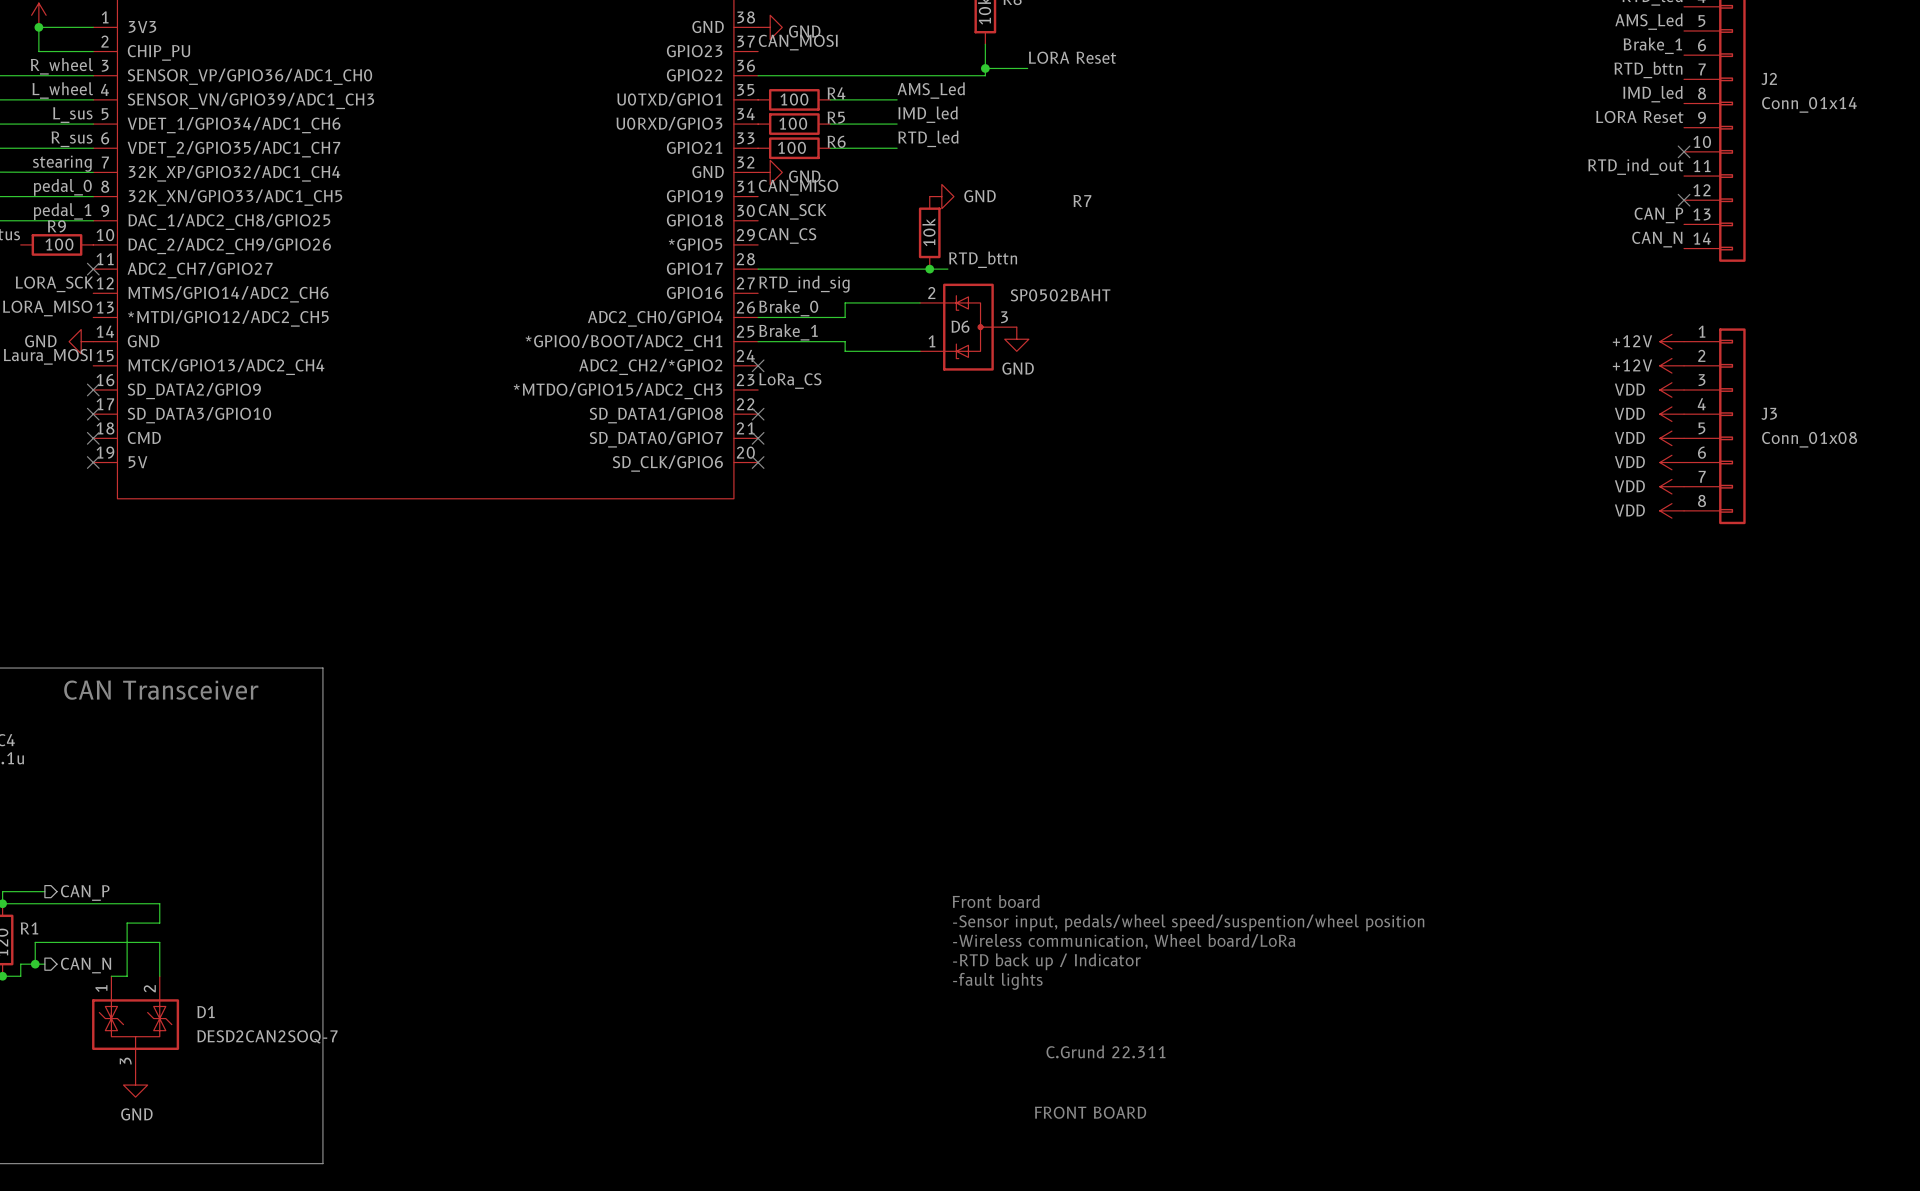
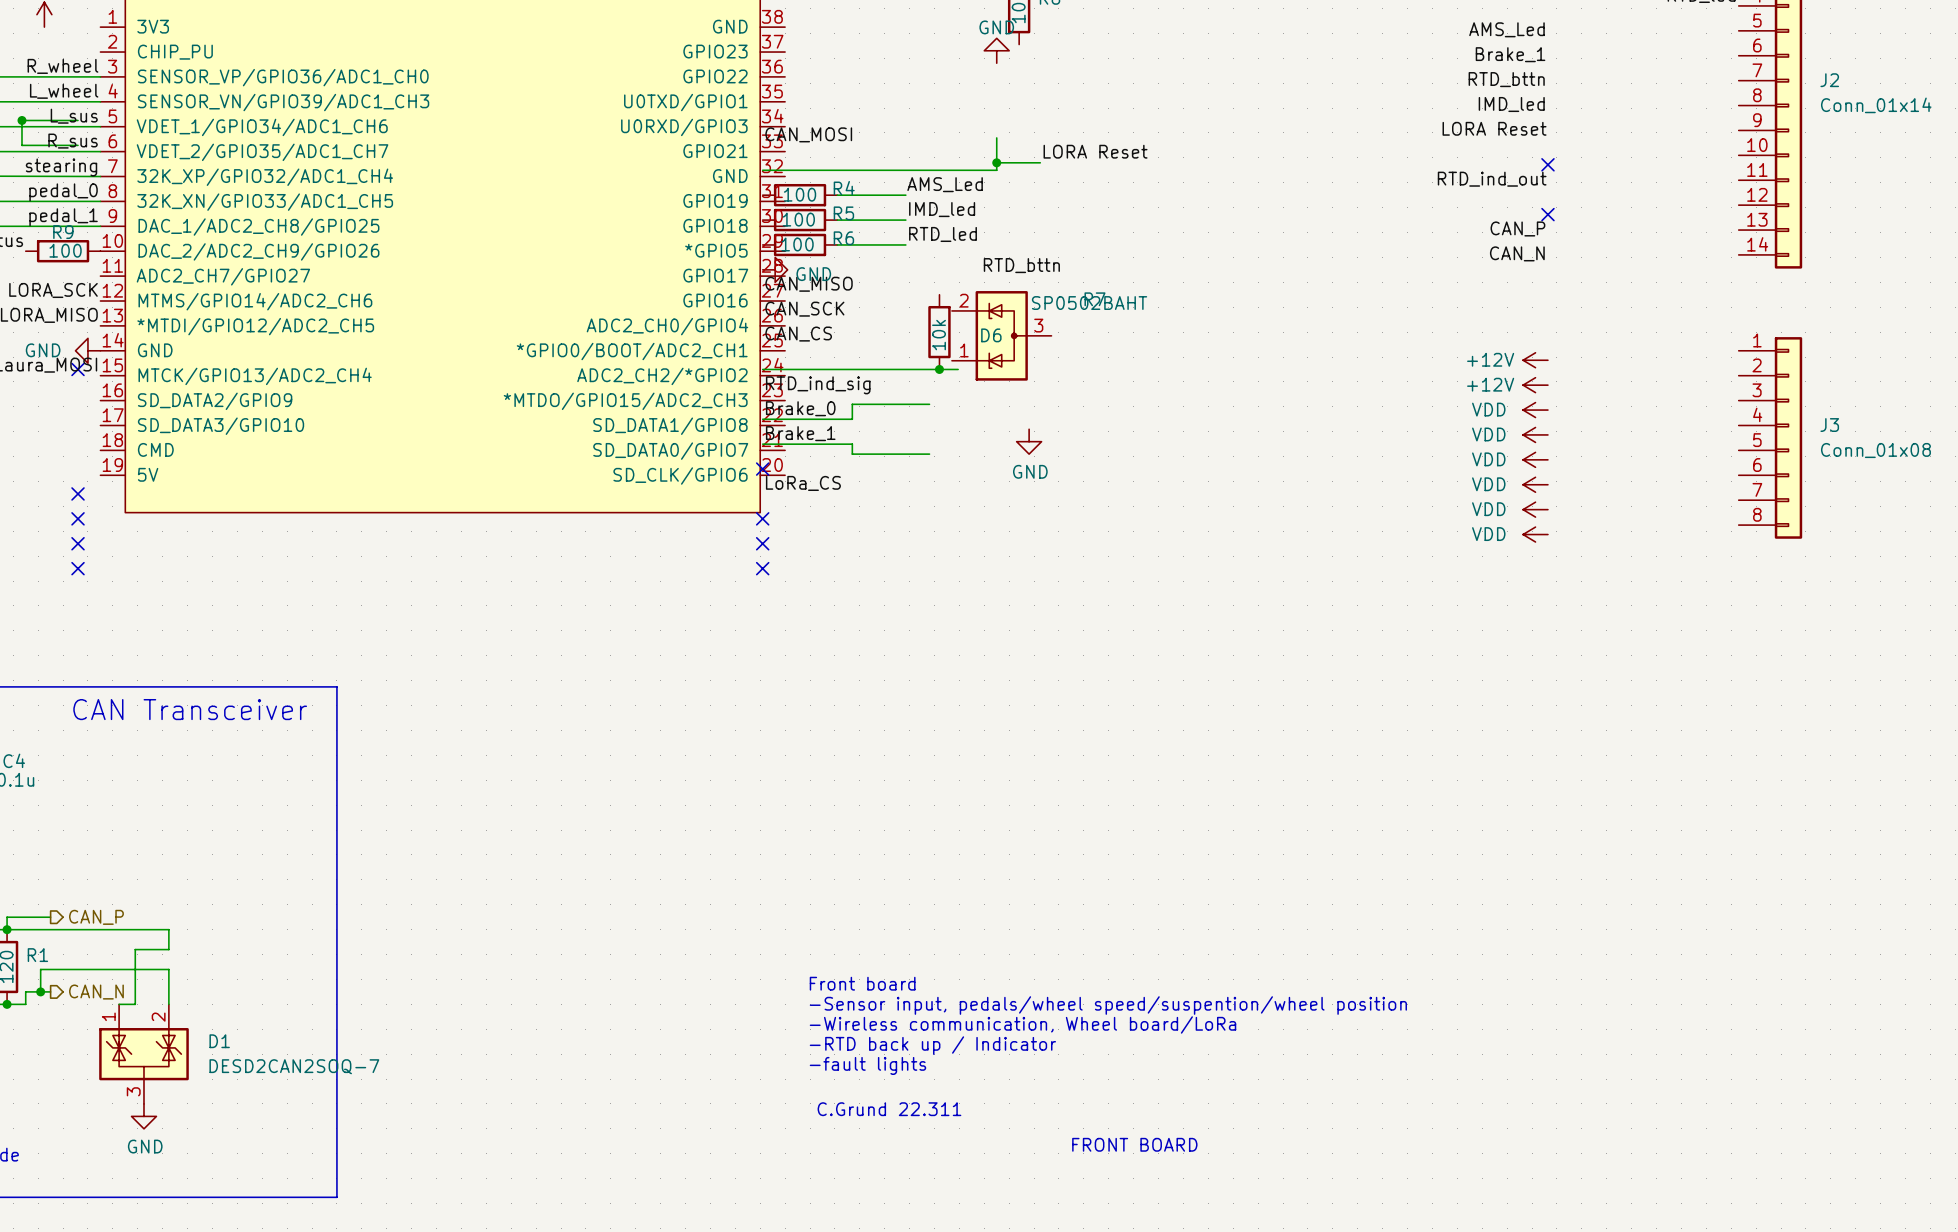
label position: AMS_Led (1648, 21) -> AMS_Led (1506, 29)
junction: (38, 27) -> none
wire: (93, 27) (38, 27) (38, 51) (93, 51) -> (78, 120) (21, 120) (21, 145) (78, 145)
power symbol: GND (770, 27) -> none
label position: CAN_MOSI (798, 42) -> CAN_MOSI (808, 134)
wire: (985, 44) (985, 75) (758, 75) -> (996, 137) (996, 170) (762, 170)
label position: Brake_1 (1652, 45) -> Brake_1 (1510, 54)
power symbol: none -> GND (996, 50)
label position: LORA Reset (1072, 57) -> LORA Reset (1095, 151)
wire: (985, 68) (1027, 68) -> (996, 162) (1040, 162)
junction: (985, 68) -> none
label position: RTD_bttn (1648, 69) -> RTD_bttn (1506, 79)
label position: AMS_Led (931, 90) -> AMS_Led (945, 184)
label position: IMD_led (1652, 94) -> IMD_led (1511, 104)
R4 position: (794, 99) -> (800, 195)
wire: (830, 99) (897, 99) -> (837, 195) (905, 195)
label position: IMD_led (928, 114) -> IMD_led (942, 209)
label position: LORA Reset (1639, 116) -> LORA Reset (1494, 128)
junction: none -> (21, 120)
R5 position: (794, 124) -> (800, 220)
wire: (830, 124) (897, 124) -> (837, 220) (905, 220)
label position: RTD_led (928, 138) -> RTD_led (943, 234)
R6 position: (794, 148) -> (800, 244)
wire: (830, 148) (897, 148) -> (837, 244) (905, 244)
no-connect mark: (1684, 151) -> none
junction: none -> (996, 162)
no-connect mark: none -> (1547, 164)
label position: RTD_ind_out (1635, 166) -> RTD_ind_out (1492, 179)
power symbol position: GND (770, 172) -> GND (775, 269)
label position: CAN_MISO (798, 187) -> CAN_MISO (809, 284)
power symbol: GND (941, 196) -> none
no-connect mark: (1684, 200) -> none
no-connect mark: none -> (1547, 214)
label position: CAN_SCK (792, 211) -> CAN_SCK (804, 309)
label position: CAN_P (1658, 215) -> CAN_P (1517, 228)
R7 position: (929, 232) -> (939, 332)
label position: CAN_CS (787, 235) -> CAN_CS (798, 334)
label position: CAN_N (1657, 239) -> CAN_N (1517, 253)
no-connect mark: (93, 269) -> none
wire: (758, 269) (947, 269) -> (762, 369) (958, 369)
junction: (929, 269) -> none
label position: RTD_ind_sig (804, 284) -> RTD_ind_sig (818, 385)
wire: (920, 302) (845, 302) (845, 317) (758, 317) -> (929, 404) (852, 404) (852, 419) (762, 419)
label position: Brake_0 (788, 308) -> Brake_0 (800, 408)
label position: Brake_1 (788, 332) -> Brake_1 (800, 433)
power symbol position: GND (1016, 339) -> GND (1029, 441)
wire: (758, 341) (845, 341) (845, 351) (920, 351) -> (762, 444) (852, 444) (852, 454) (929, 454)
power symbol: +12V (1671, 341) -> none
power symbol: none -> +12V (1535, 360)
no-connect mark: none -> (78, 369)
junction: none -> (939, 369)
no-connect mark: (758, 365) -> none
power symbol: +12V (1671, 365) -> none
power symbol: none -> +12V (1535, 385)
label position: LoRa_CS (790, 381) -> LoRa_CS (803, 483)
no-connect mark: (93, 390) -> none
power symbol: VDD (1671, 390) -> none
power symbol: none -> VDD (1535, 410)
no-connect mark: (93, 414) -> none
no-connect mark: (758, 414) -> none
power symbol: VDD (1671, 414) -> none
power symbol: none -> VDD (1535, 434)
no-connect mark: (93, 438) -> none
no-connect mark: (758, 438) -> none
power symbol: VDD (1671, 438) -> none
power symbol: none -> VDD (1535, 459)
no-connect mark: none -> (762, 469)
no-connect mark: (93, 462) -> none
no-connect mark: (758, 462) -> none
power symbol: VDD (1671, 462) -> none
power symbol: none -> VDD (1535, 484)
no-connect mark: none -> (78, 493)
power symbol: VDD (1671, 486) -> none
power symbol: none -> VDD (1535, 509)
no-connect mark: none -> (78, 518)
no-connect mark: none -> (762, 518)
power symbol: VDD (1671, 510) -> none
power symbol: none -> VDD (1535, 534)
no-connect mark: none -> (78, 543)
no-connect mark: none -> (762, 543)
no-connect mark: none -> (78, 568)
no-connect mark: none -> (762, 568)
text position: Front board (996, 901) -> Front board (862, 983)
text position: -Sensor input, pedals/wheel speed/suspention/wheel position (1188, 922) -> -Sensor input, pedals/wheel speed/suspention/wheel position (1108, 1005)
text position: -Wireless communication, Wheel board/LoRa (1124, 941) -> -Wireless communication, Wheel board/LoRa (1022, 1024)
text position: -RTD back up / Indicator (1046, 961) -> -RTD back up / Indicator (932, 1045)
text position: -fault lights (997, 981) -> -fault lights (867, 1065)
text: C.Grund 22.311 (1105, 1051) -> none
text: none -> C.Grund 22.311 (889, 1109)

